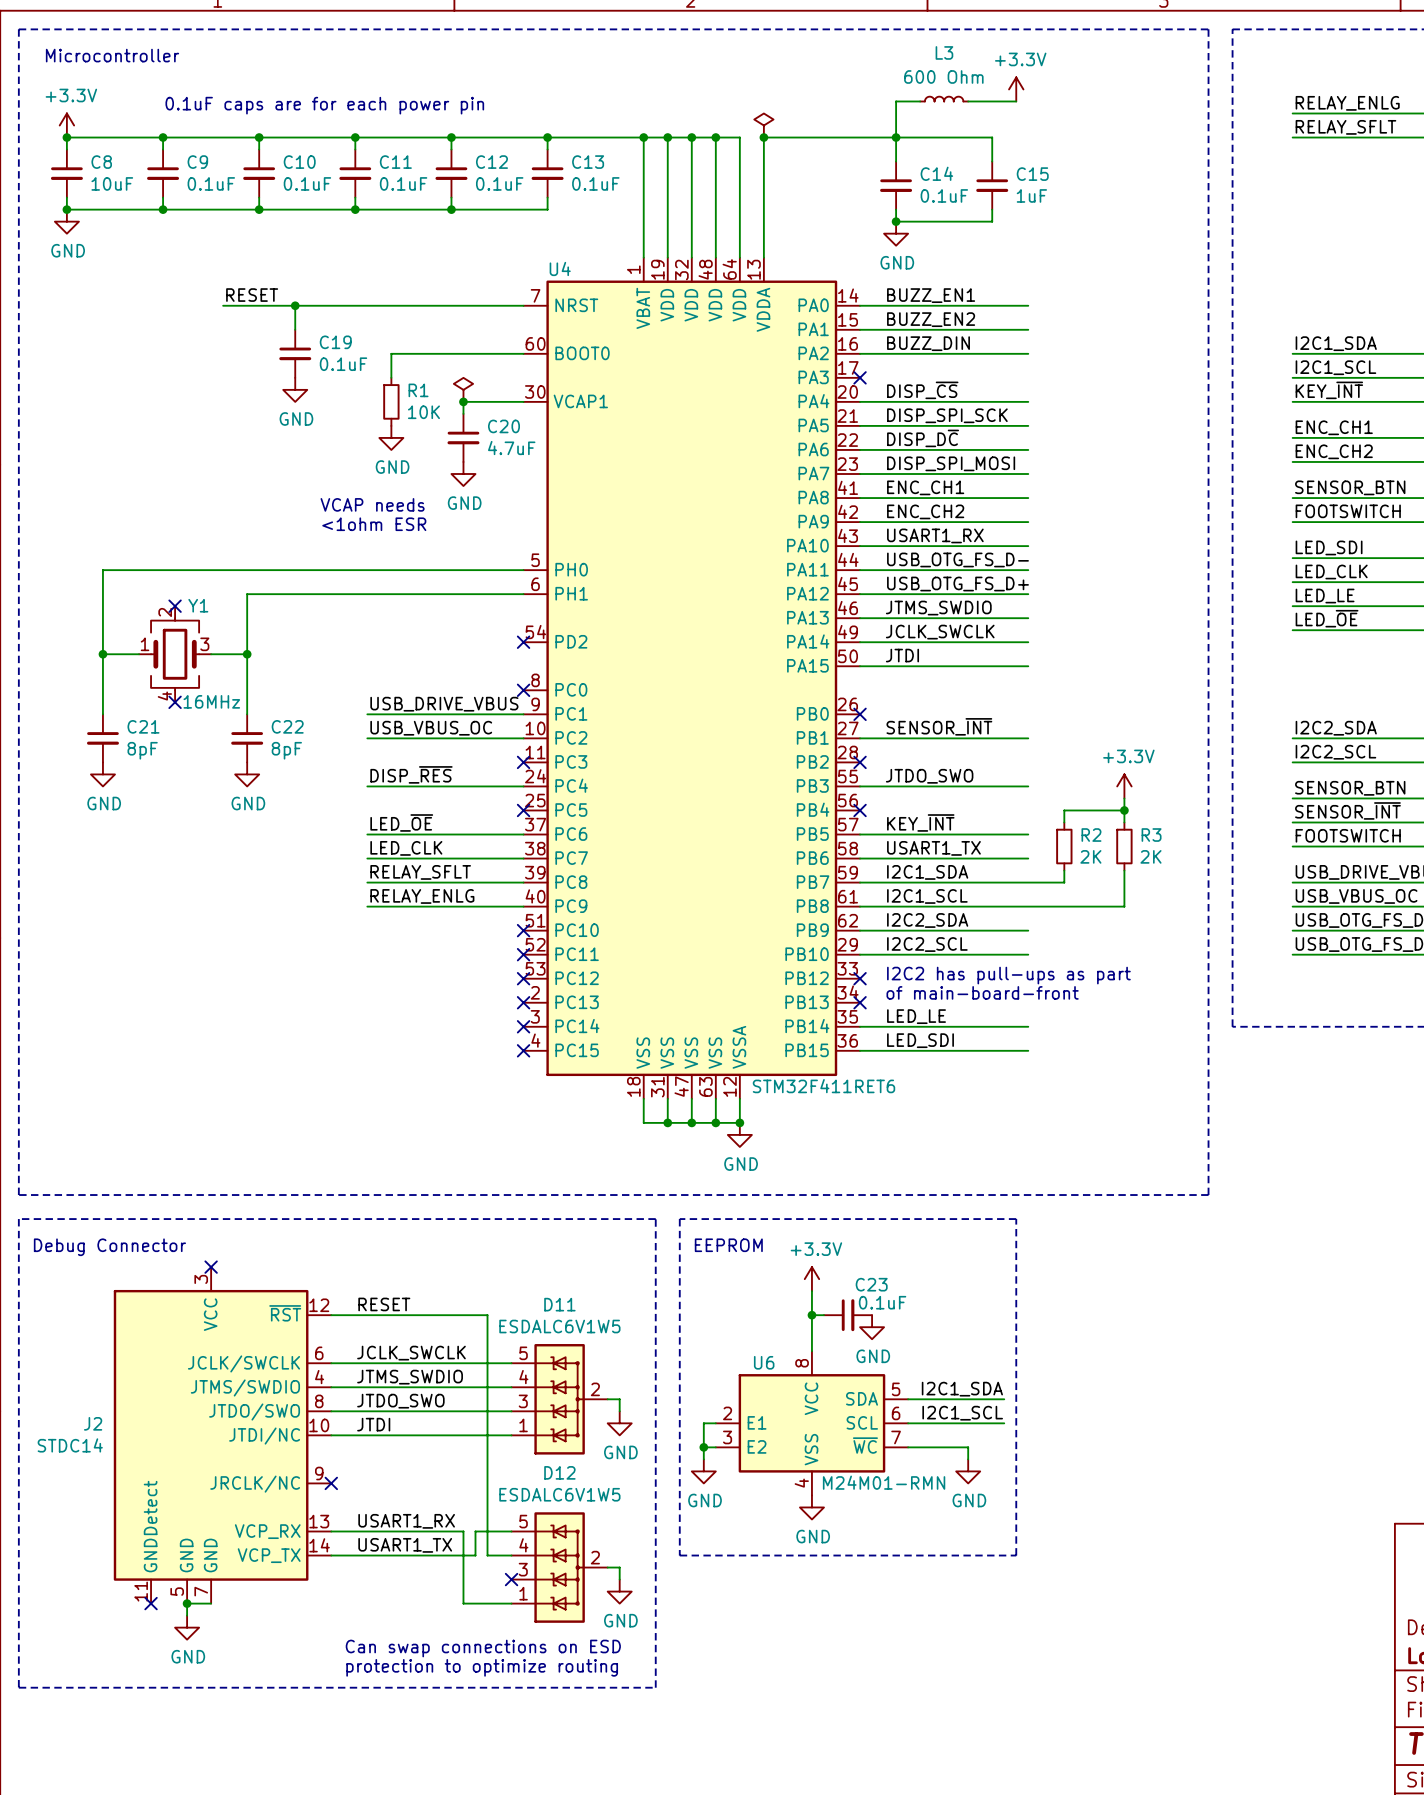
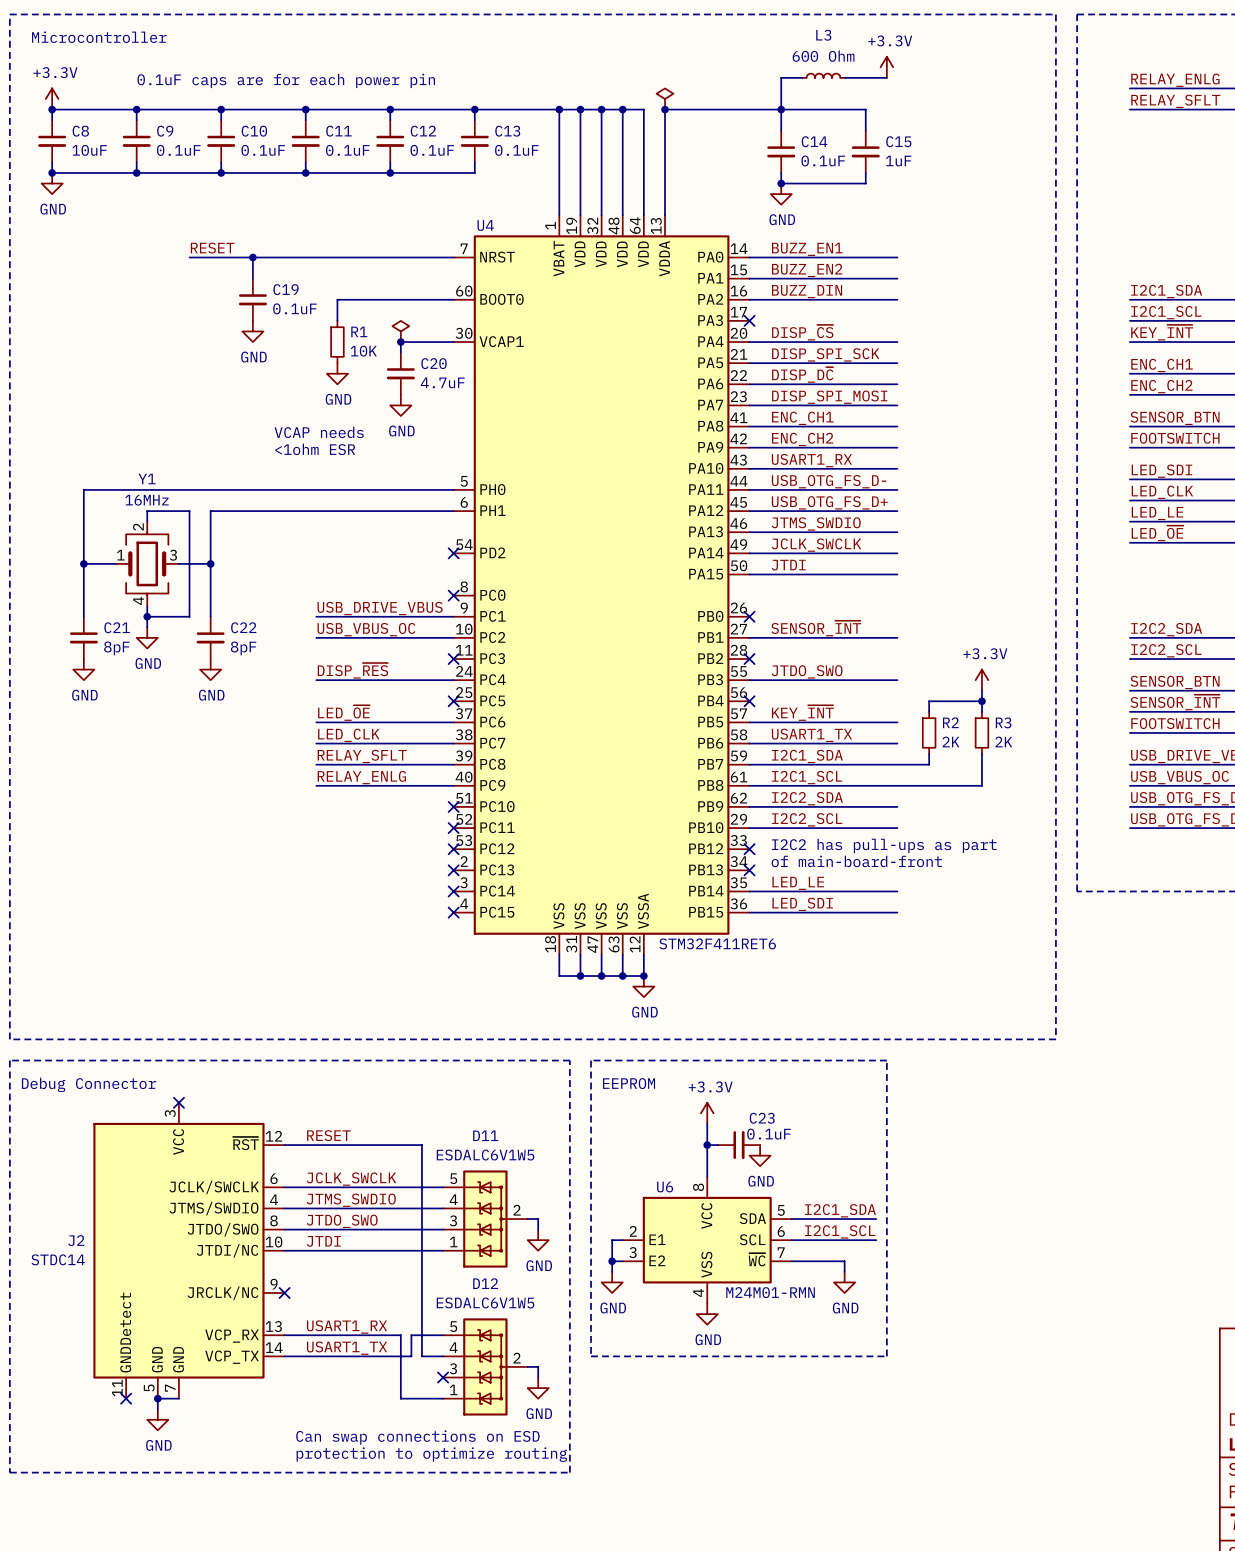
Y1 name position: Y1 (198, 605) -> Y1 (147, 478)
wire: none -> (147, 521) (147, 511) (189, 511) (189, 616) (147, 616)
no-connect mark: (175, 606) -> none
Y1 value position: 16MHz (211, 701) -> 16MHz (147, 500)
wire: none -> (147, 606) (147, 627)
no-connect mark: (175, 702) -> none
junction: none -> (147, 616)
power symbol: none -> GND (147, 637)

